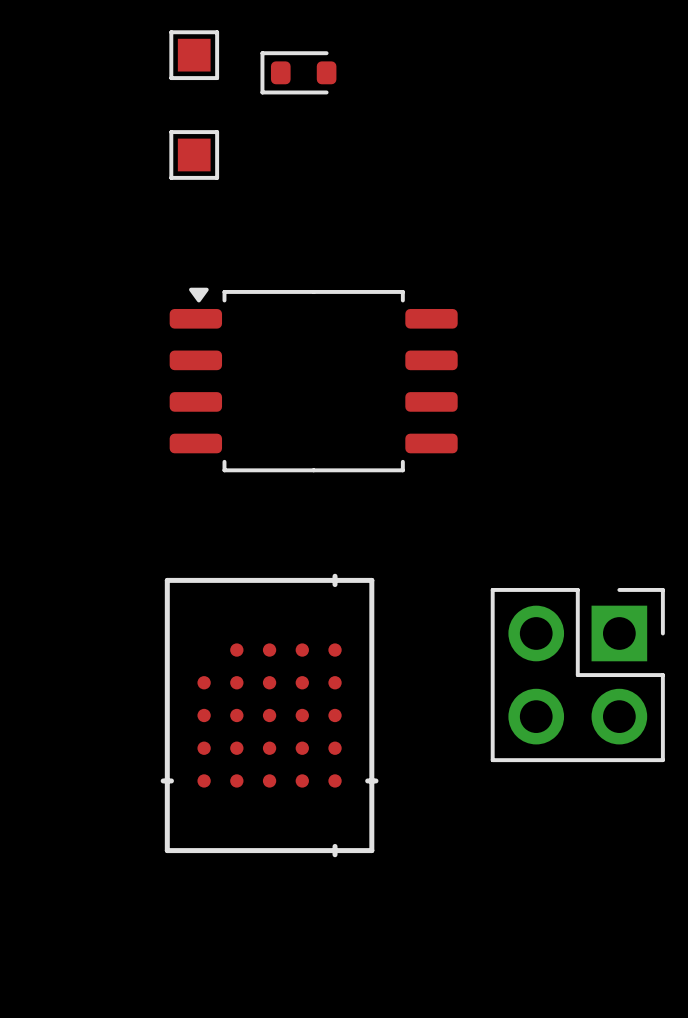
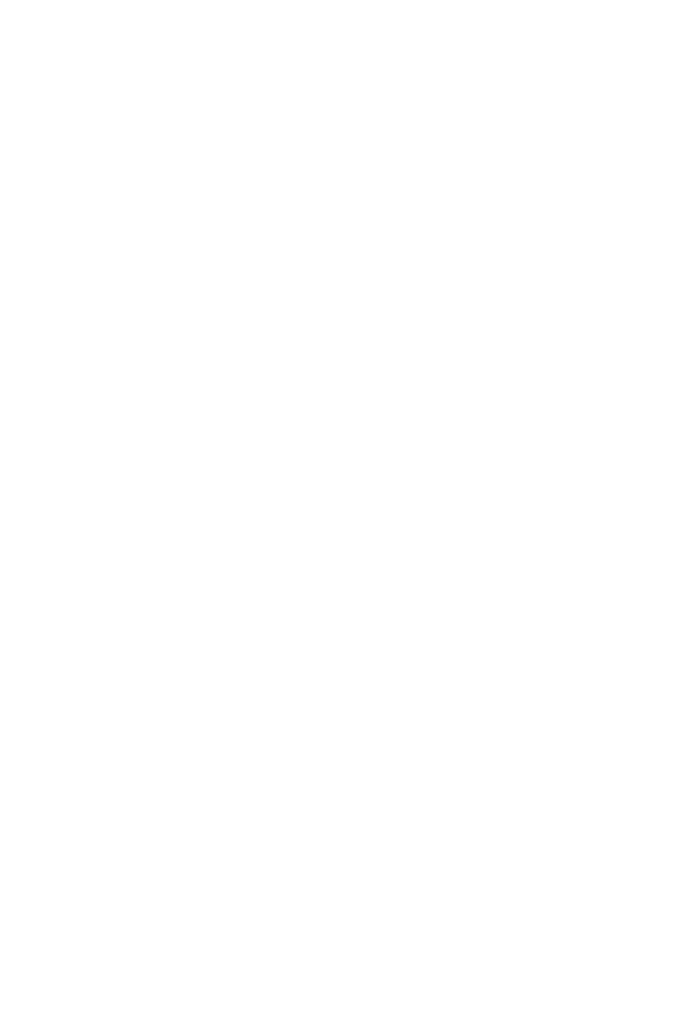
part: (194, 55) -> none
part: (298, 72) -> none
part: (194, 154) -> none
part: (313, 380) -> none
part: (577, 675) -> none
part: (269, 715) -> none

